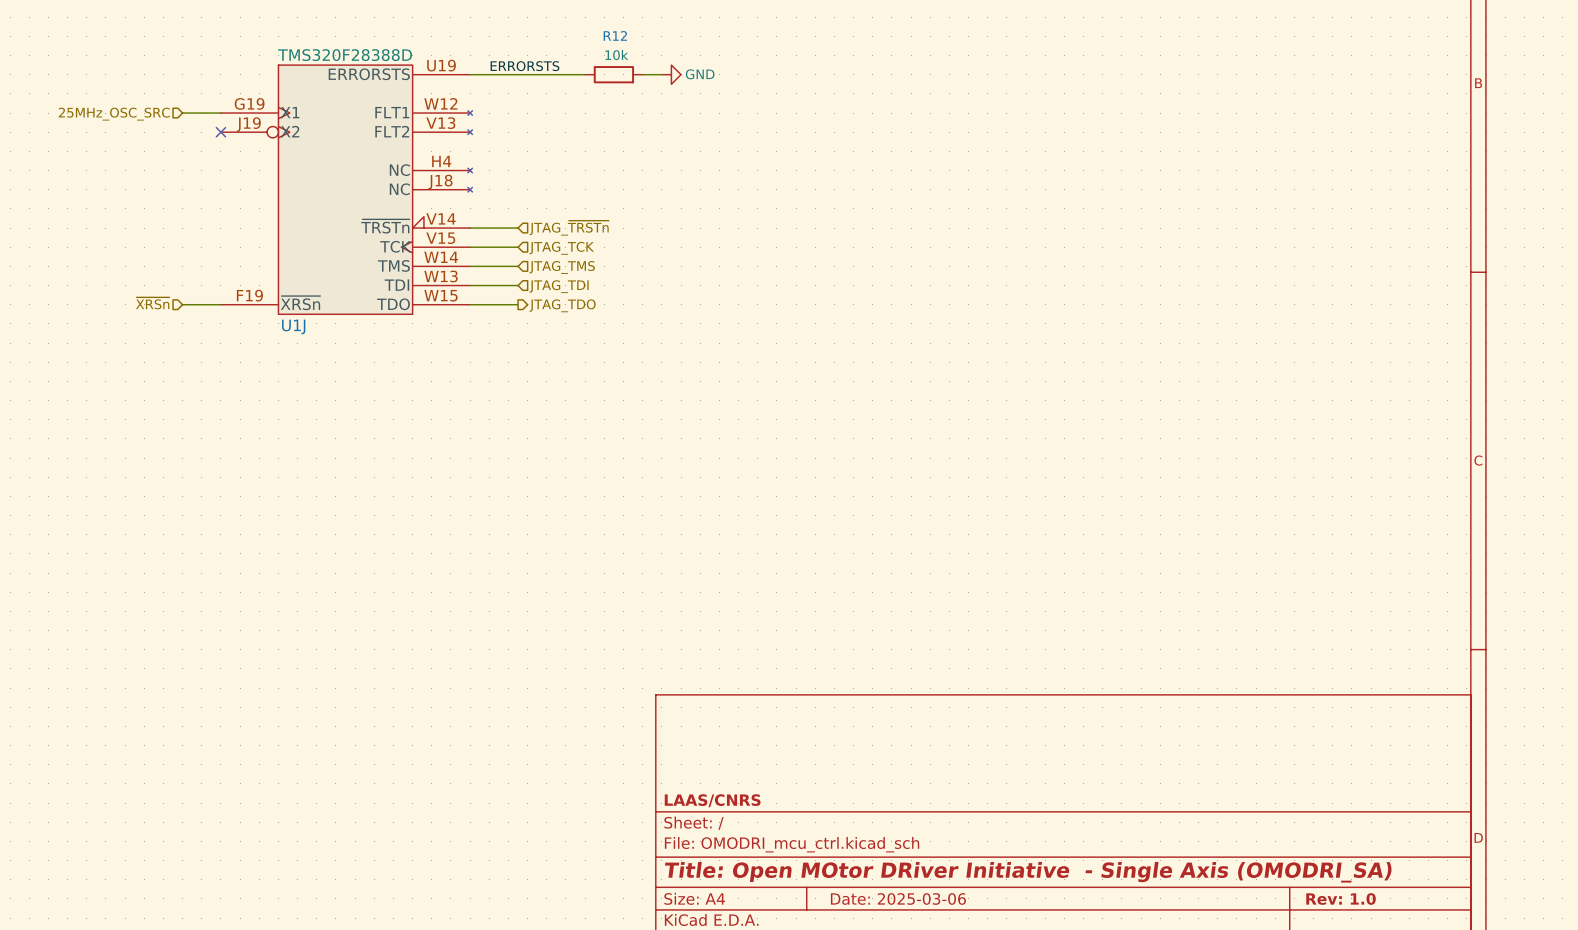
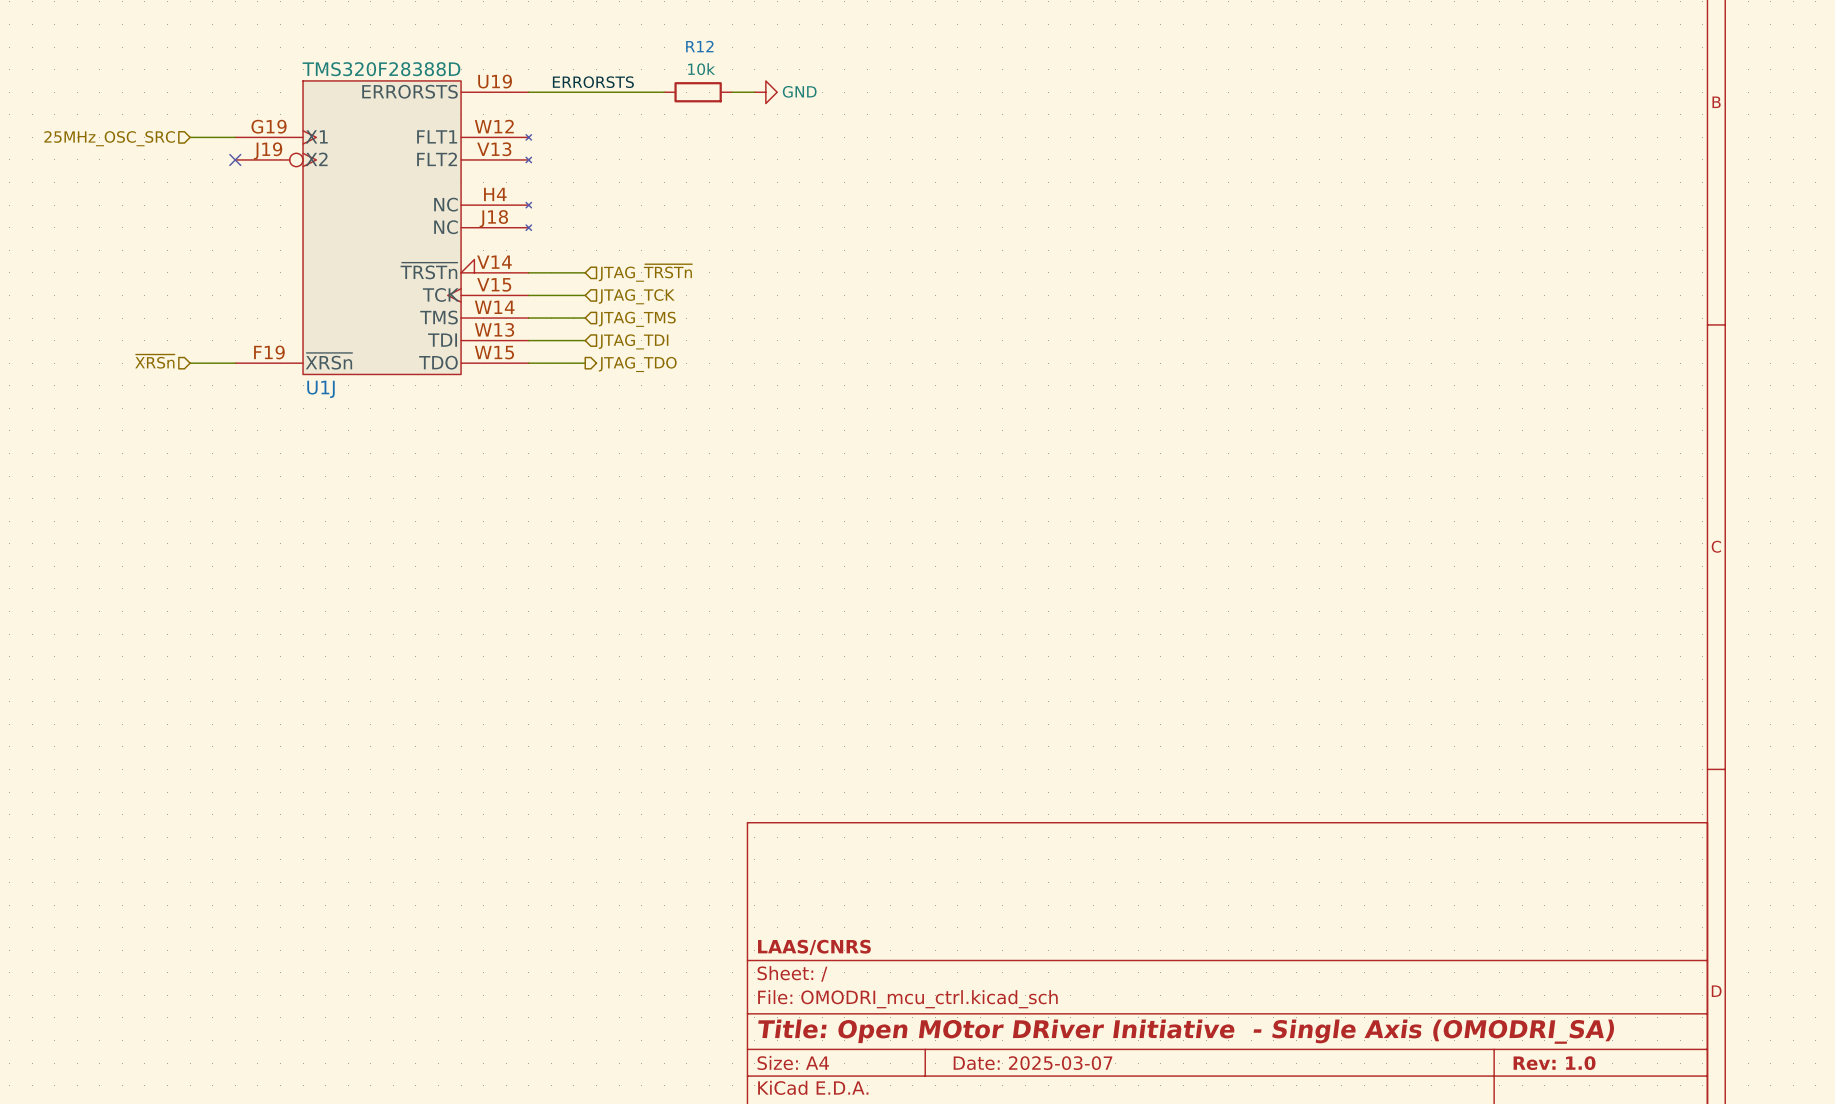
title block: Date: 2025-03-06 (898, 898) -> Date: 2025-03-07 (1033, 1063)

